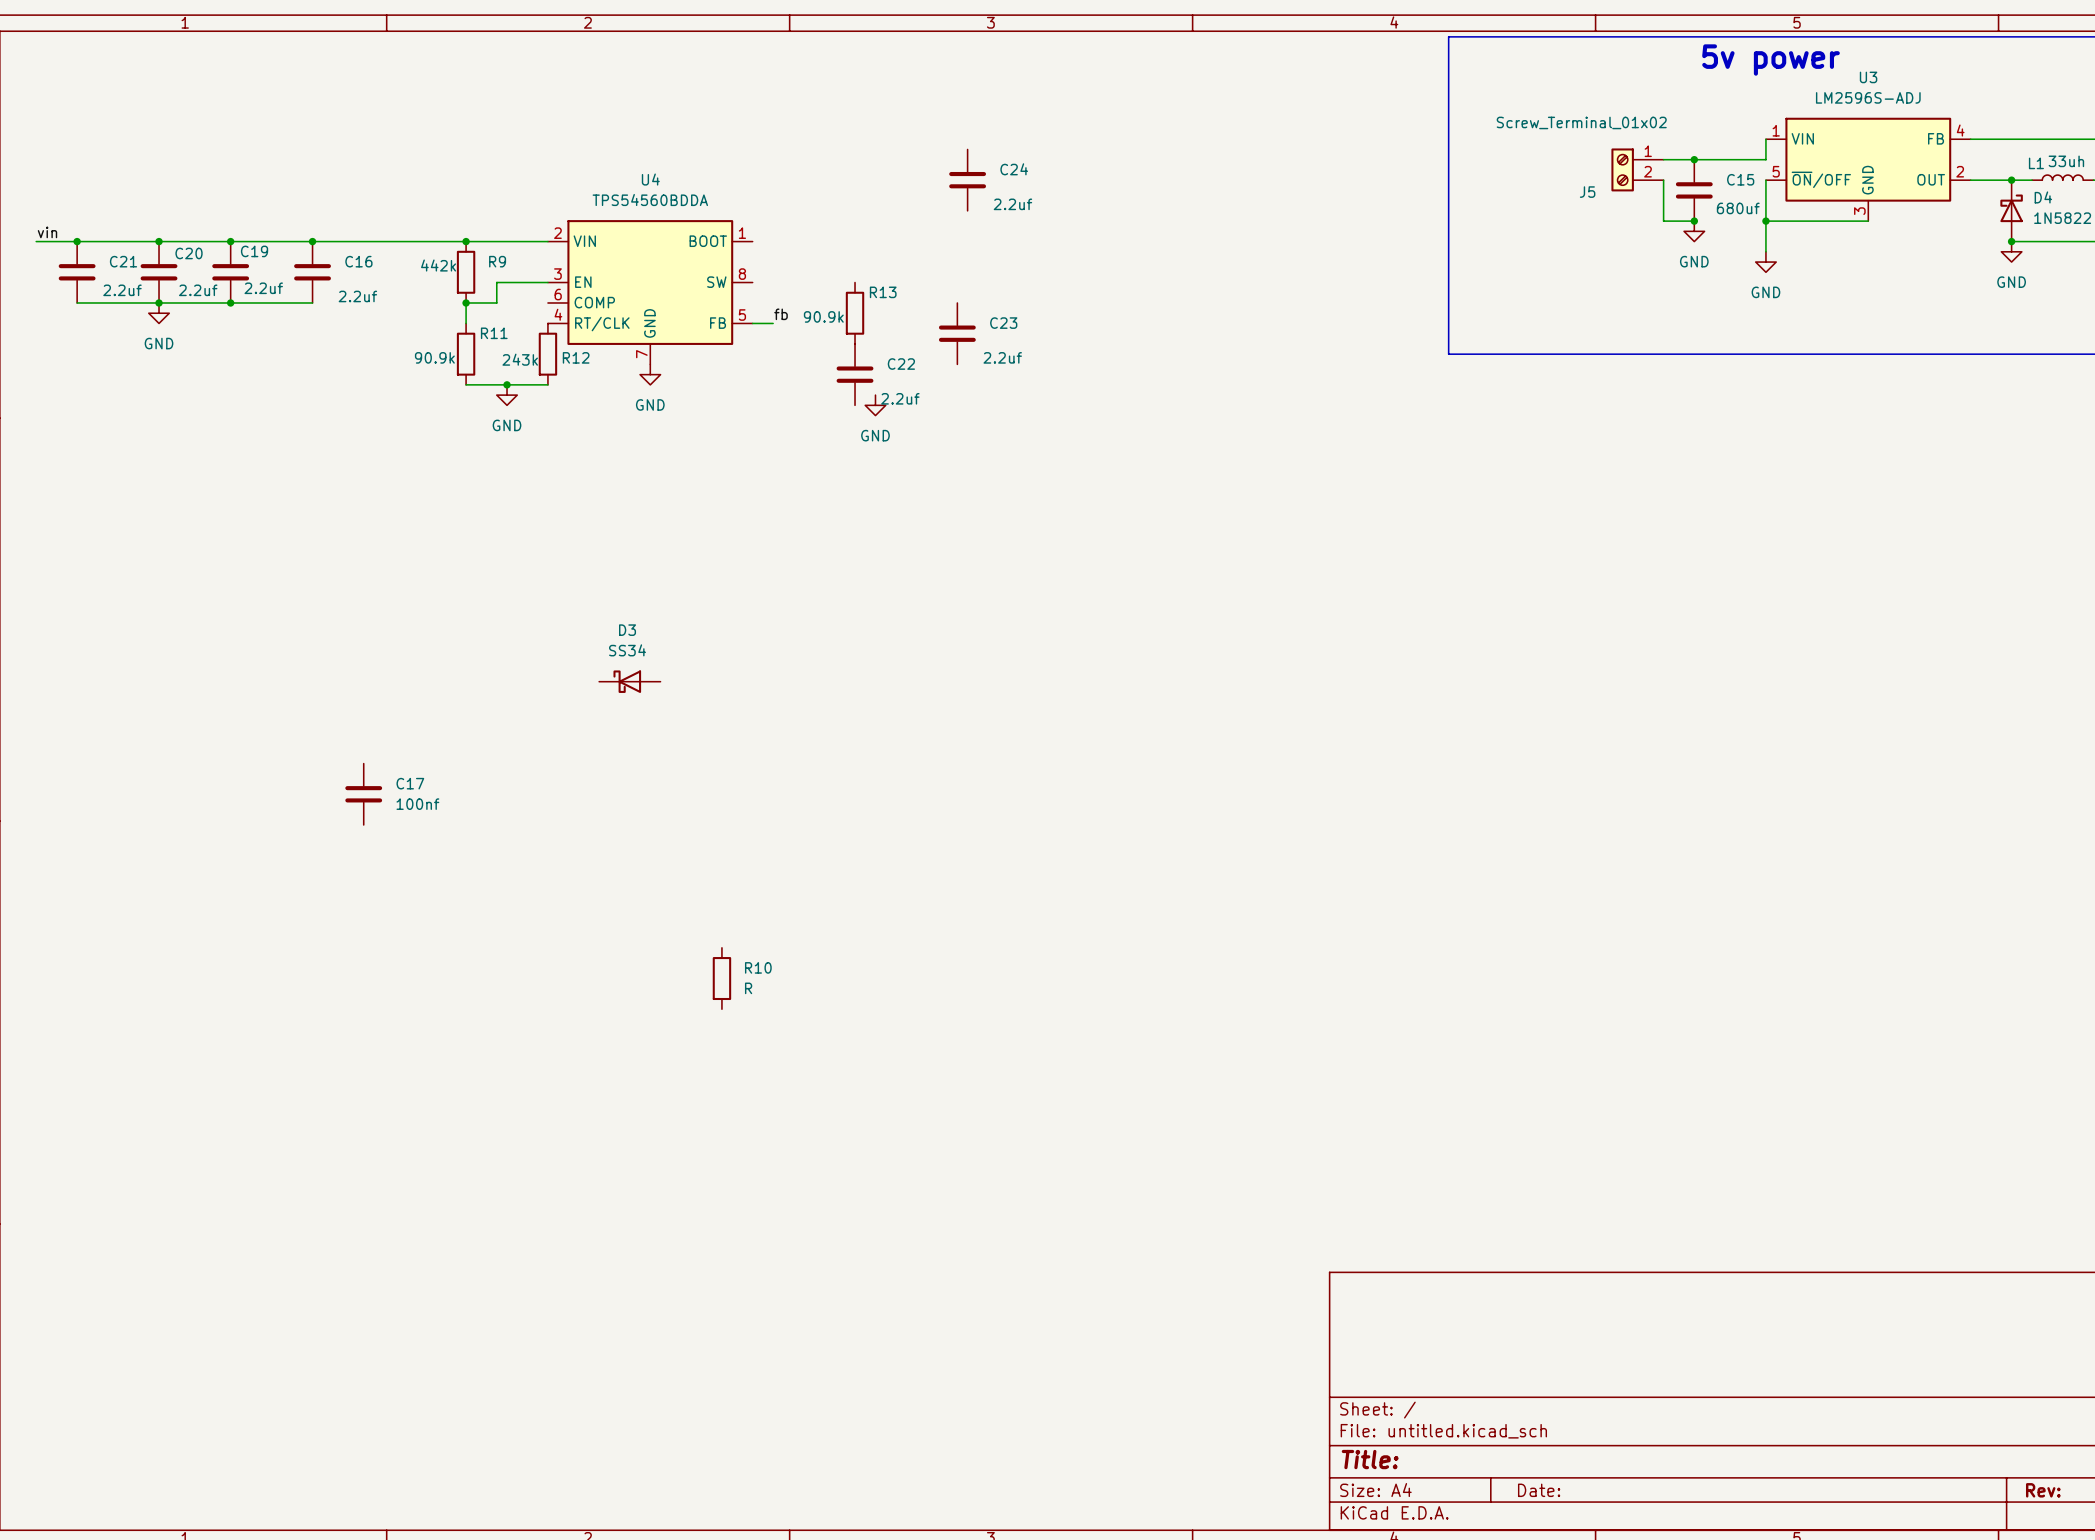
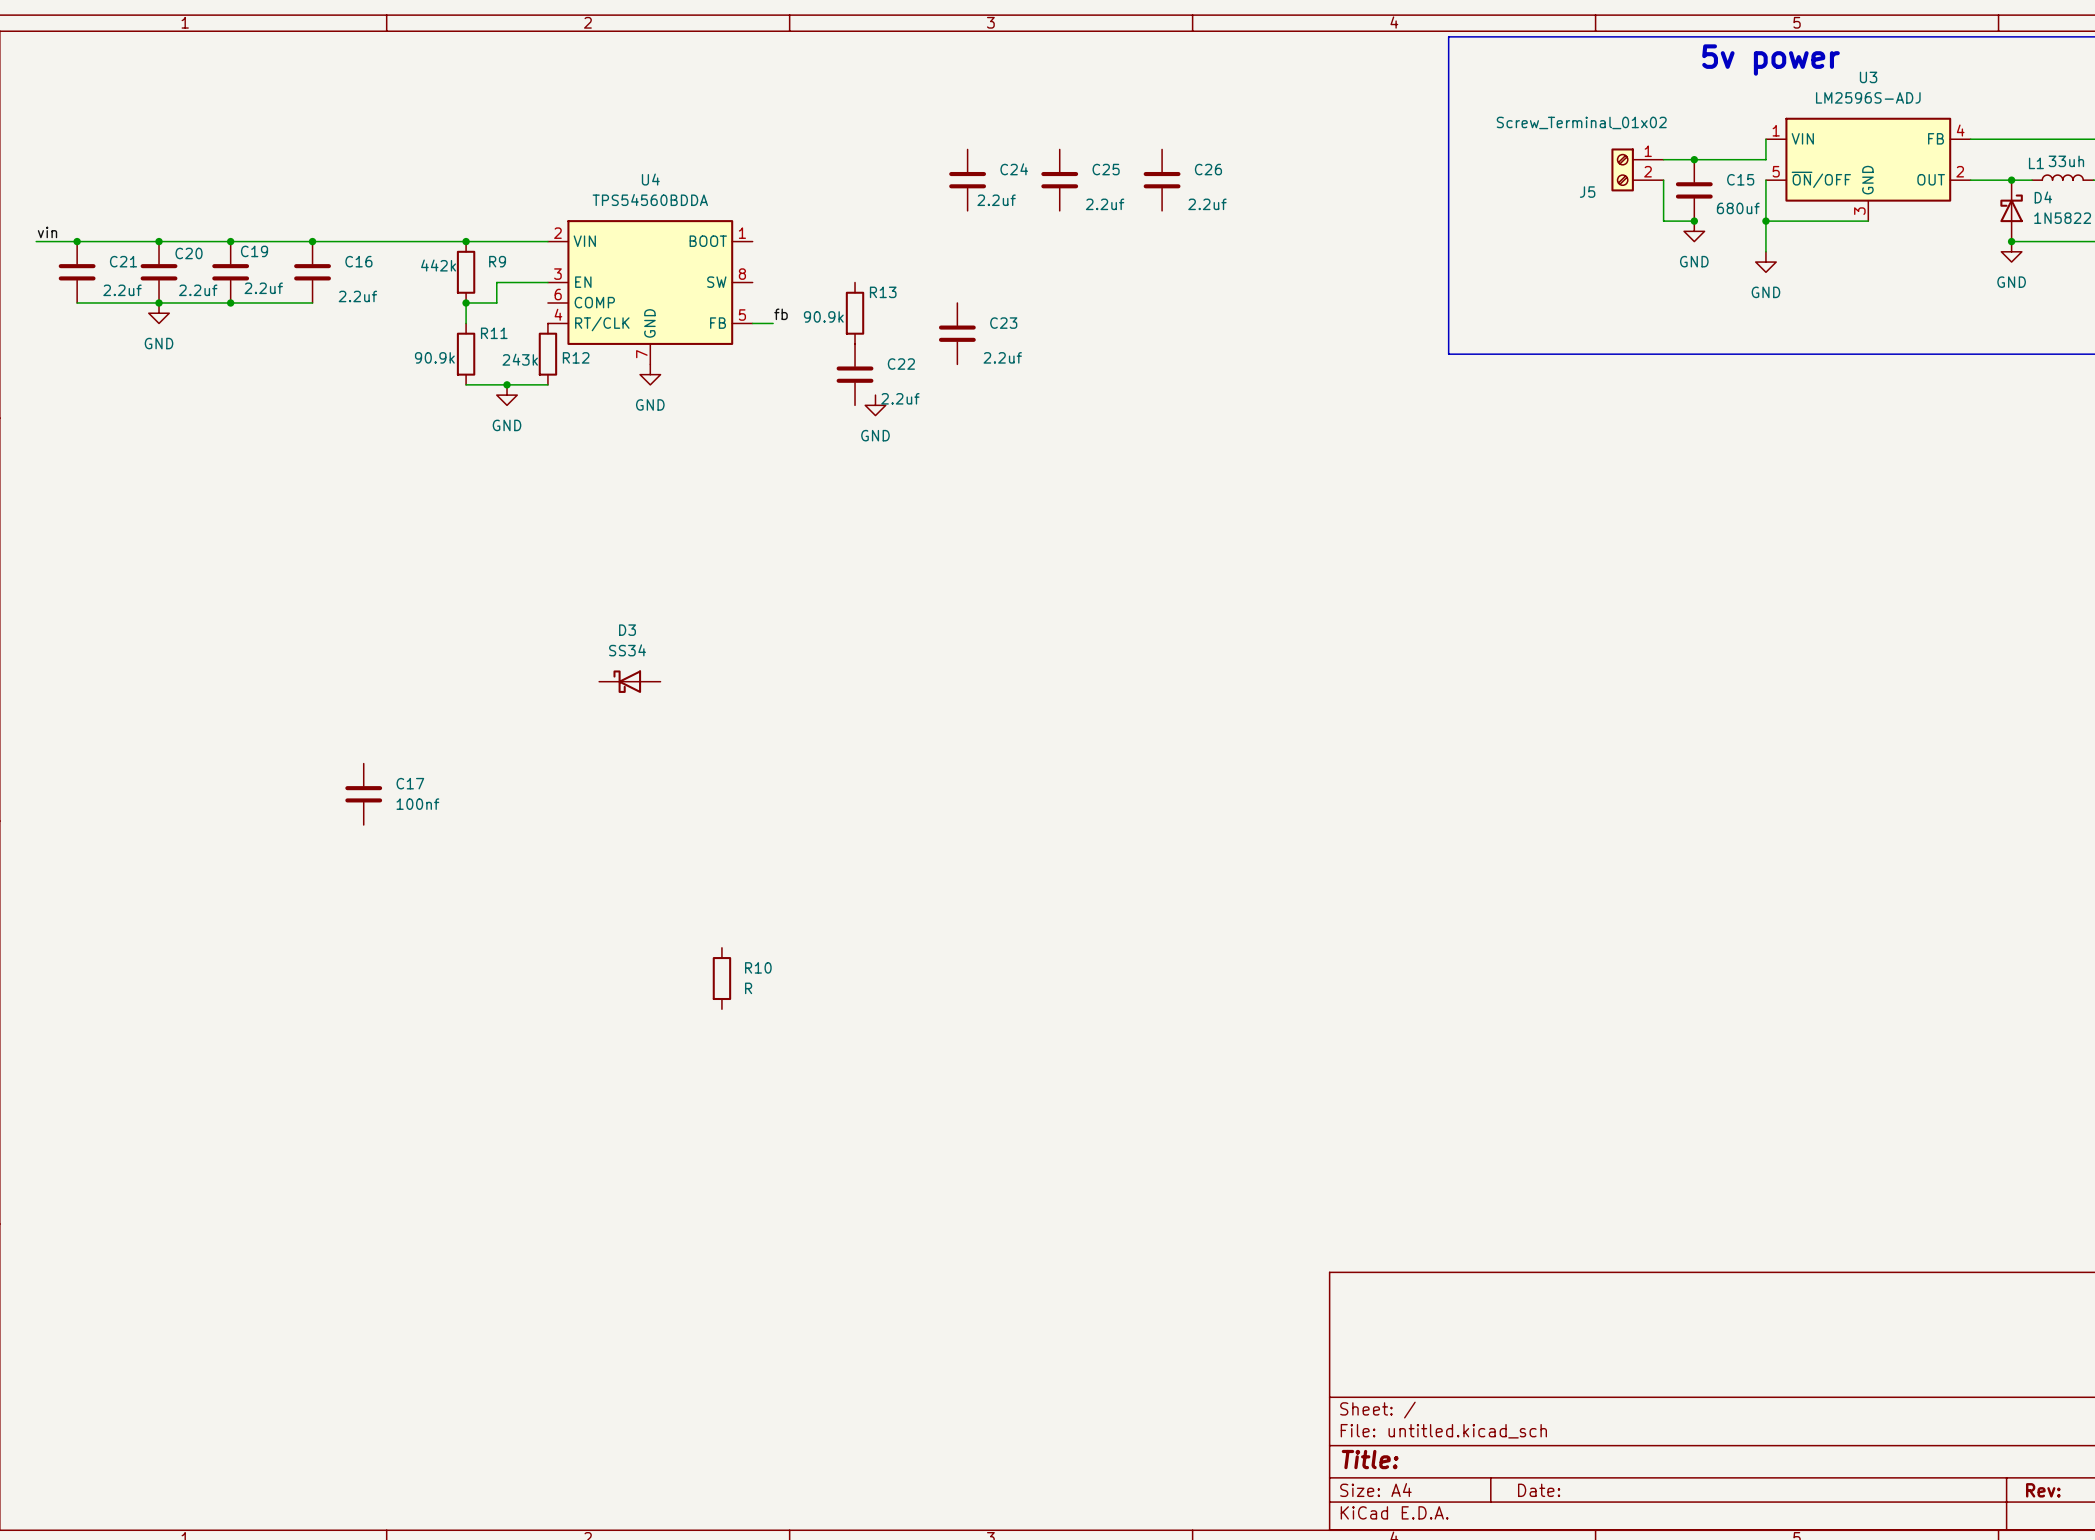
C25: none -> 2.2uf (1059, 180)
C26: none -> 2.2uf (1162, 180)
C24 value position: 2.2uf (1012, 204) -> 2.2uf (996, 200)

